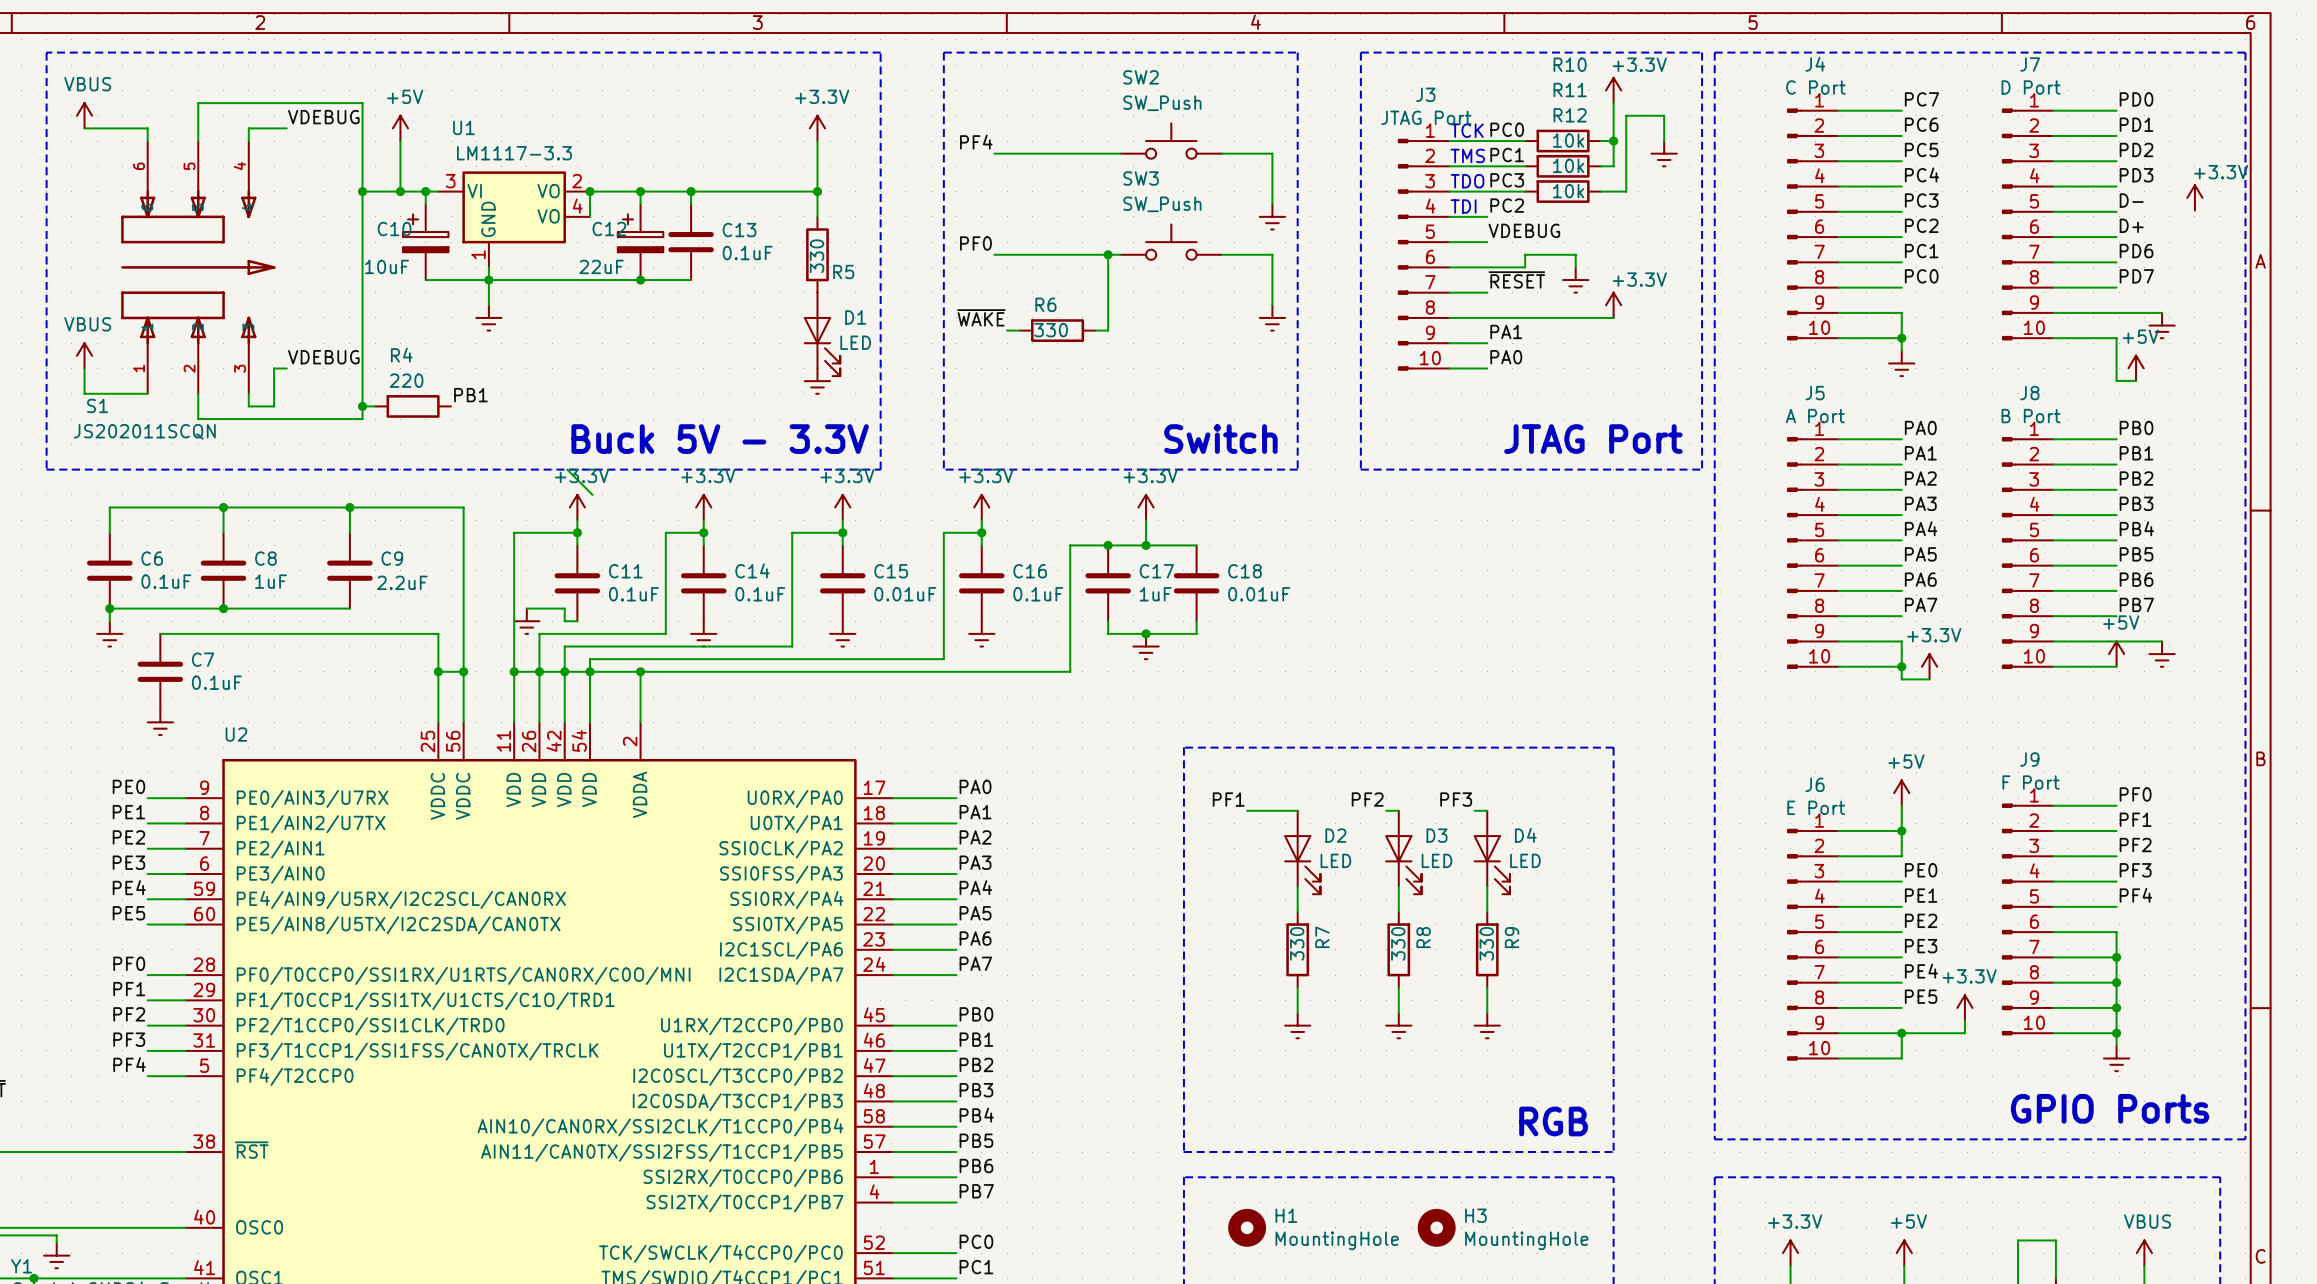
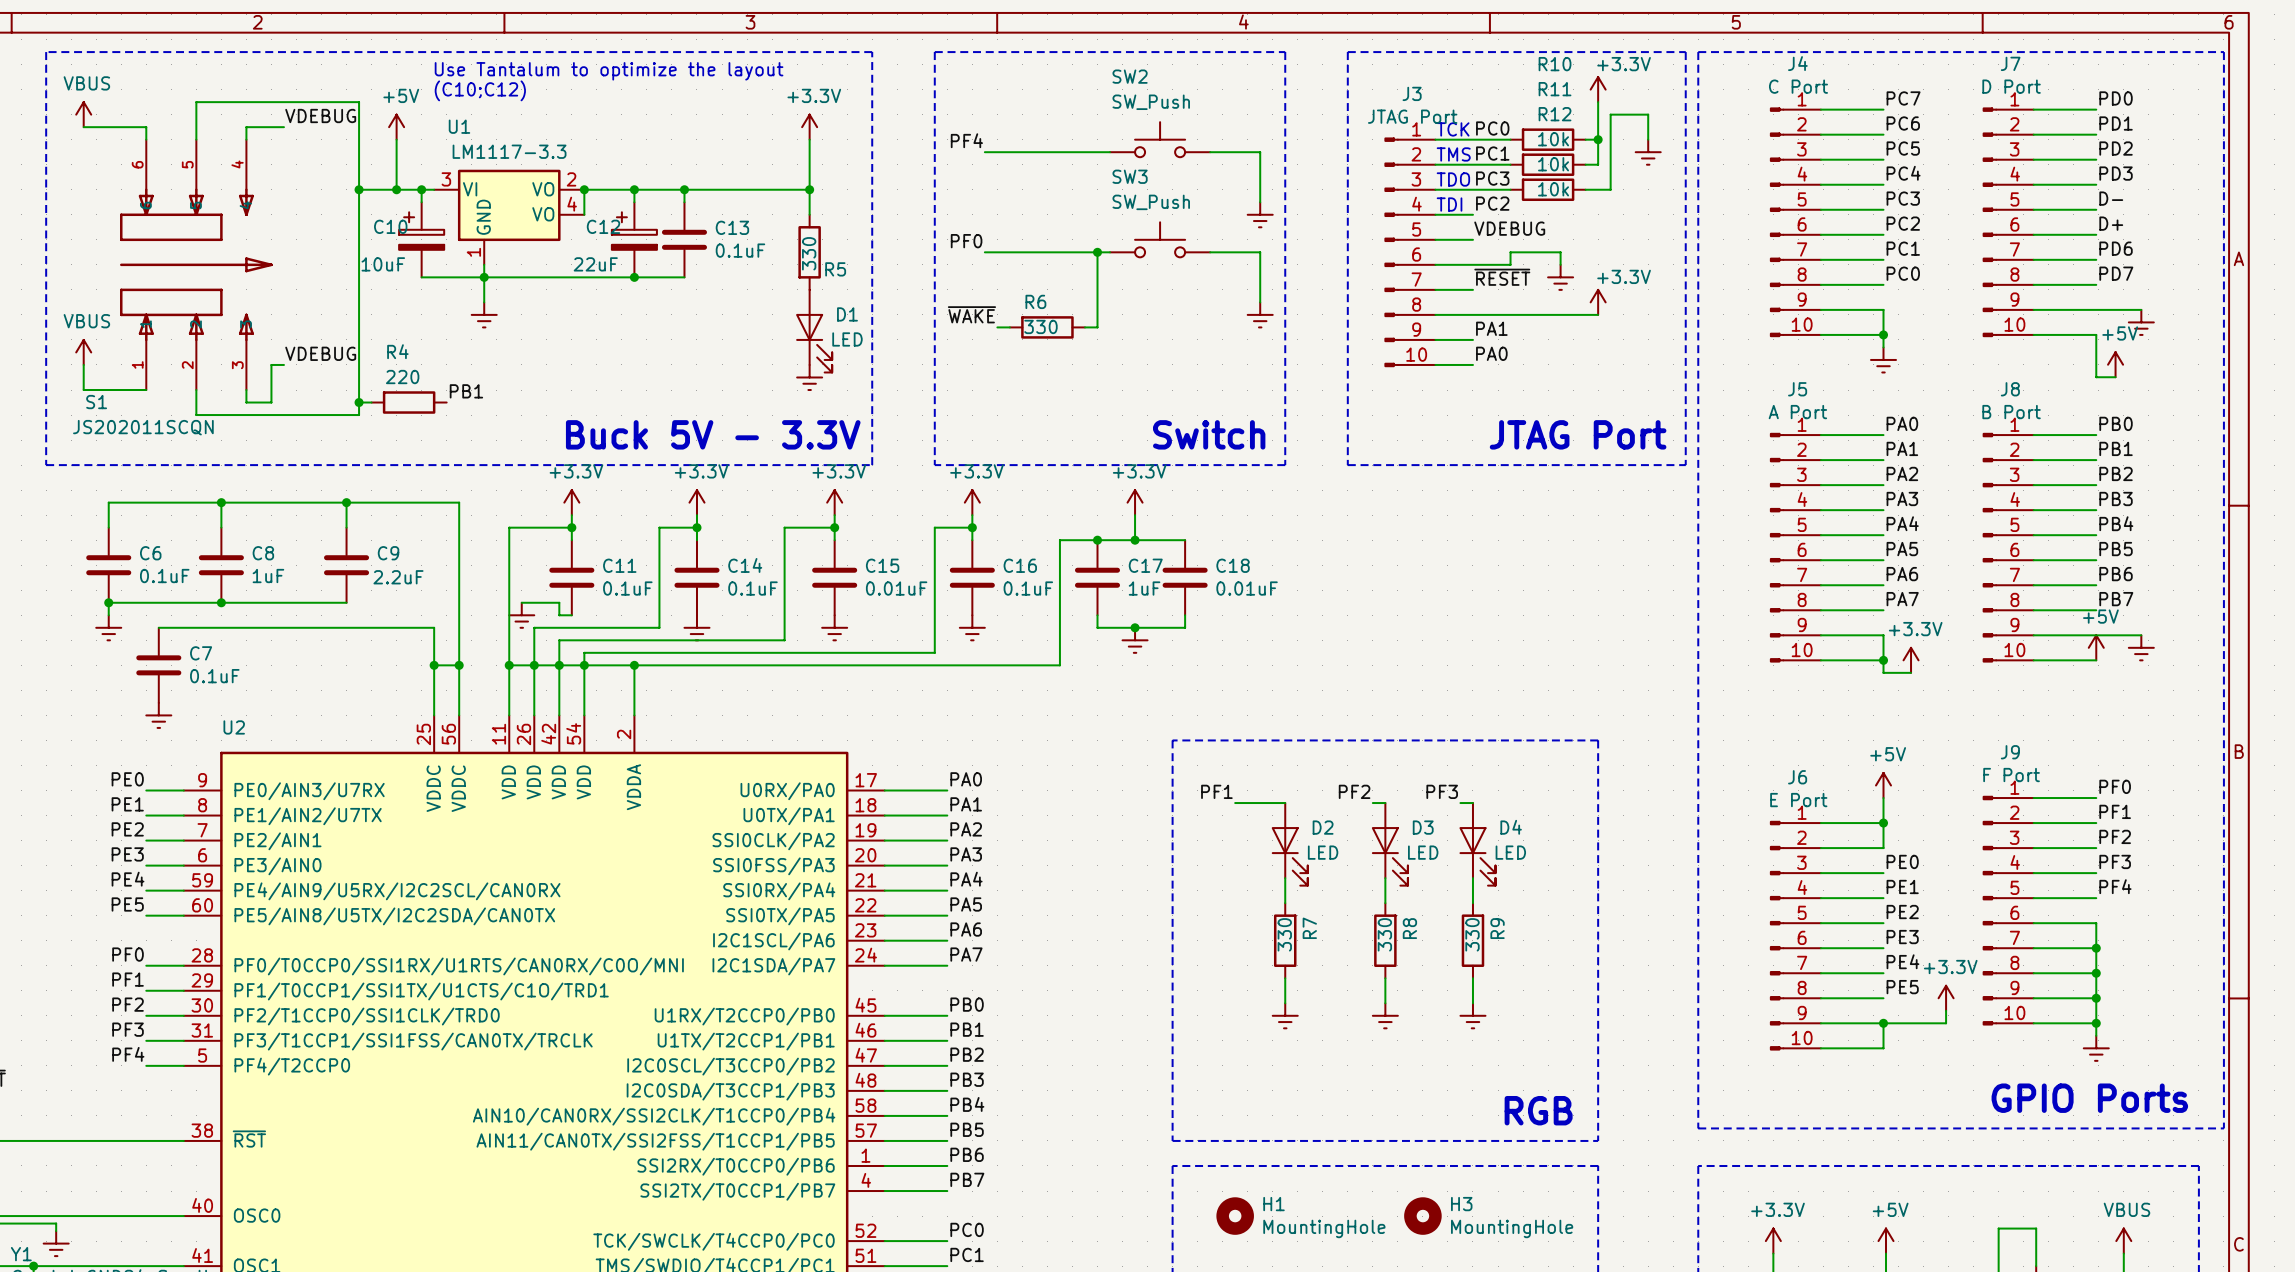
text: none -> Use Tantalum to optimize the layout (609, 71)
text: none -> (C10;C12) (480, 90)
power symbol: +3.3V (2194, 197) -> none
wire: (567, 469) (592, 494) -> none

